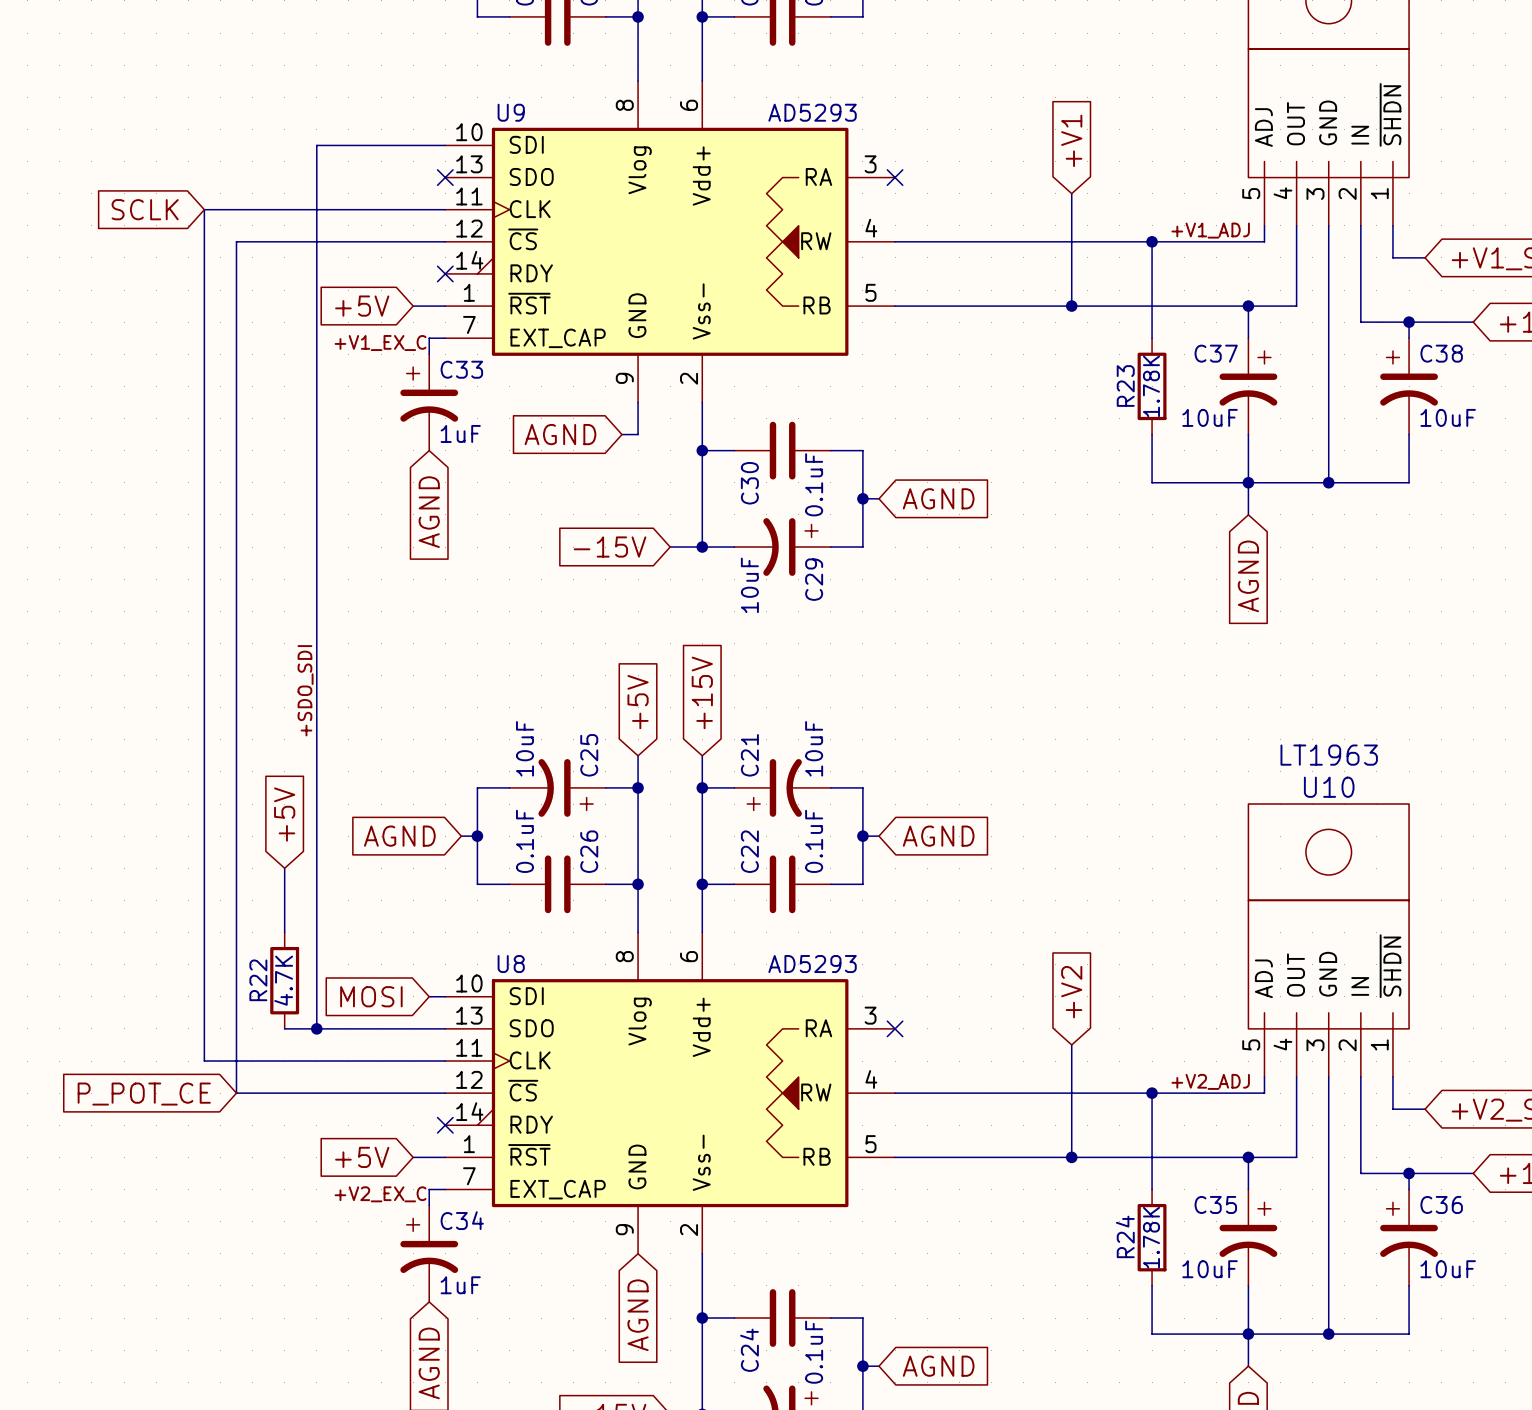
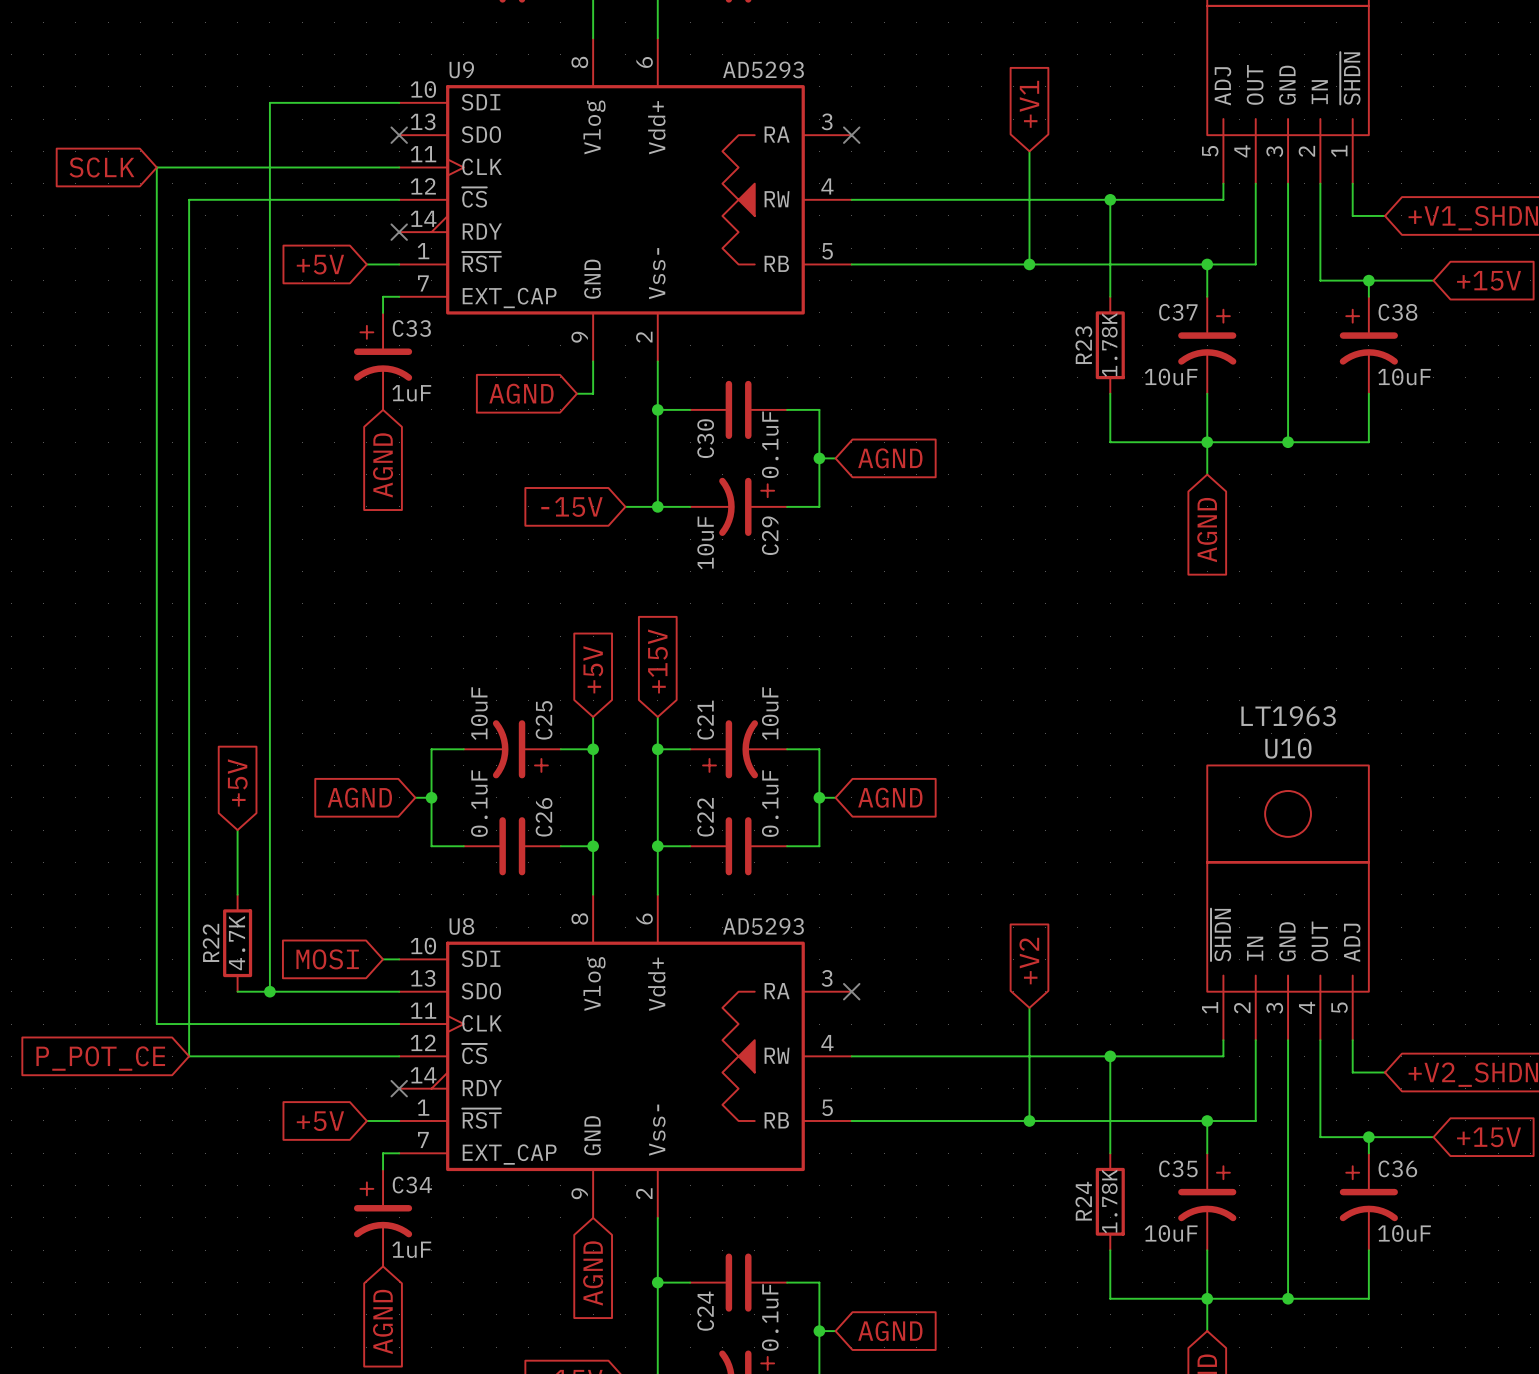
label: +V1_ADJ (1210, 230) -> none
label: +V1_EX_C (380, 343) -> none
label: +SDO_SDI (305, 690) -> none
U10 flip: as is (1328, 916) -> left-right (1288, 878)
label: +V2_ADJ (1210, 1081) -> none
label: +V2_EX_C (380, 1194) -> none

